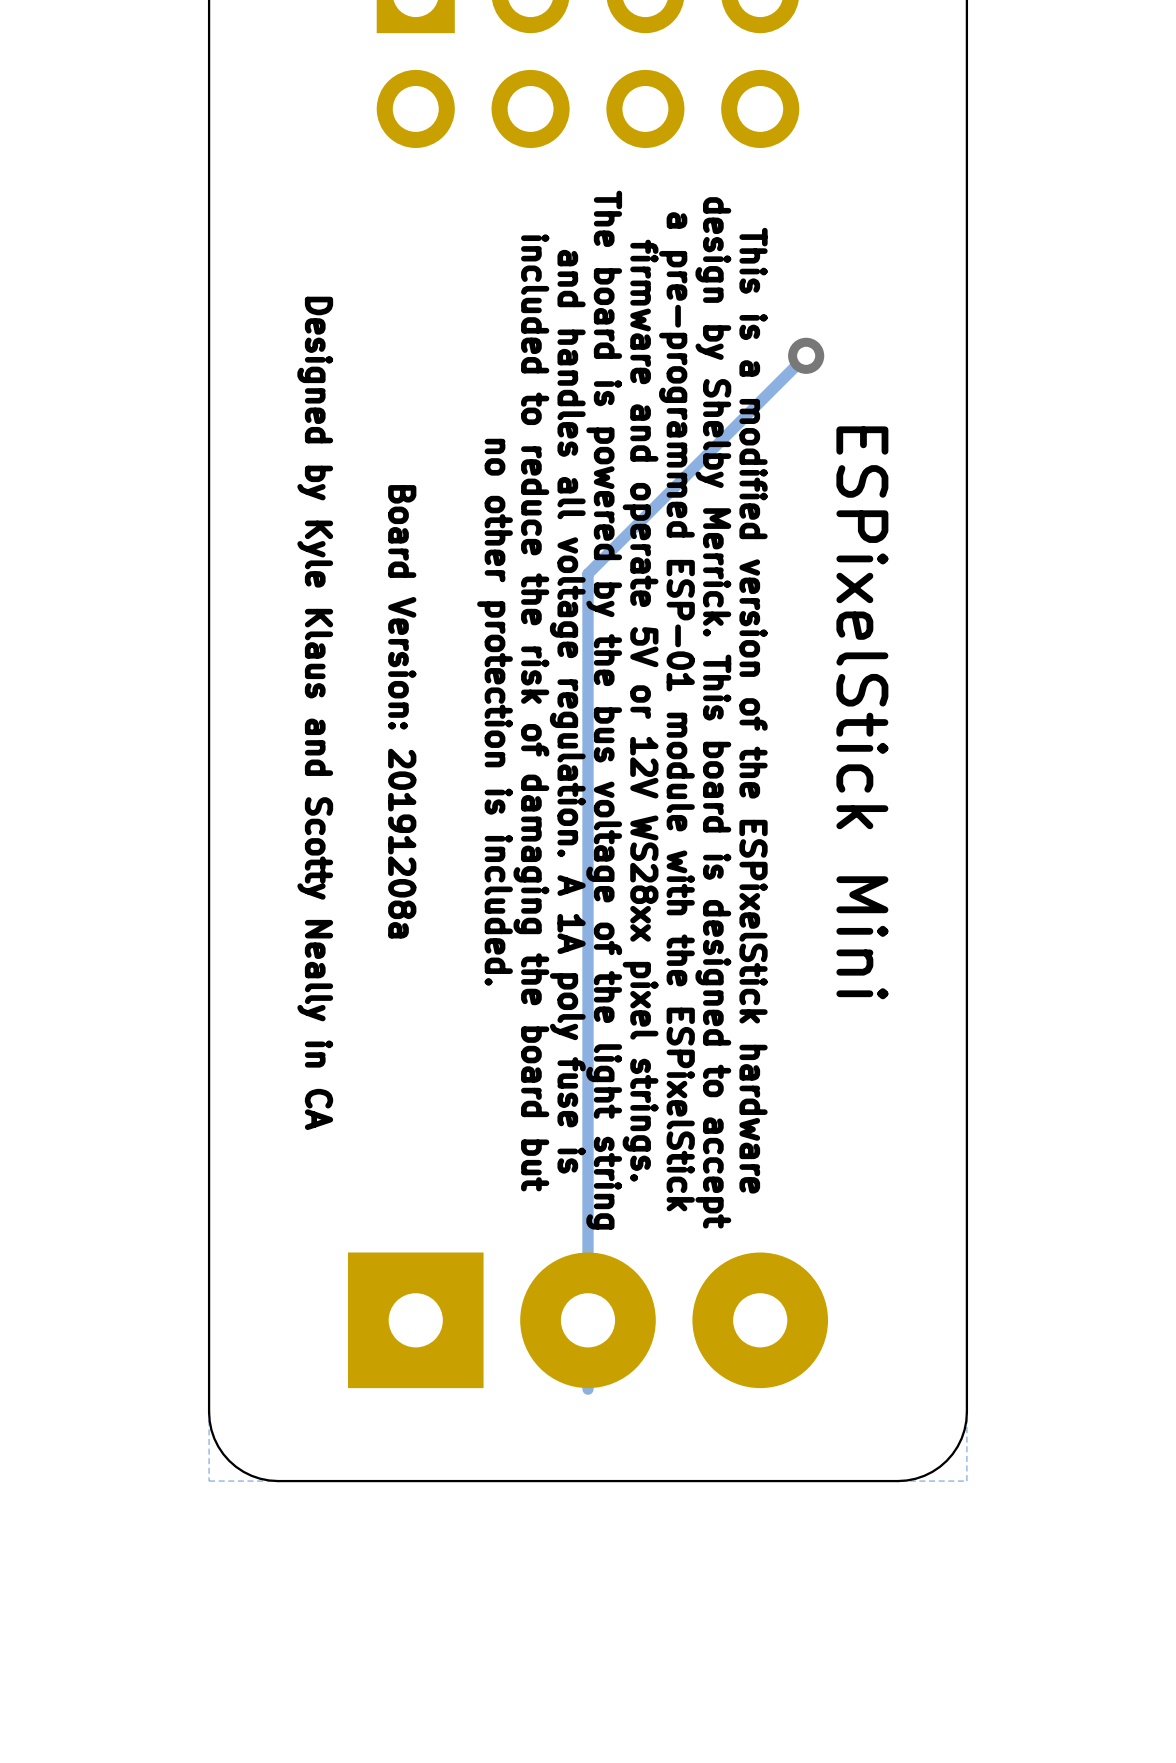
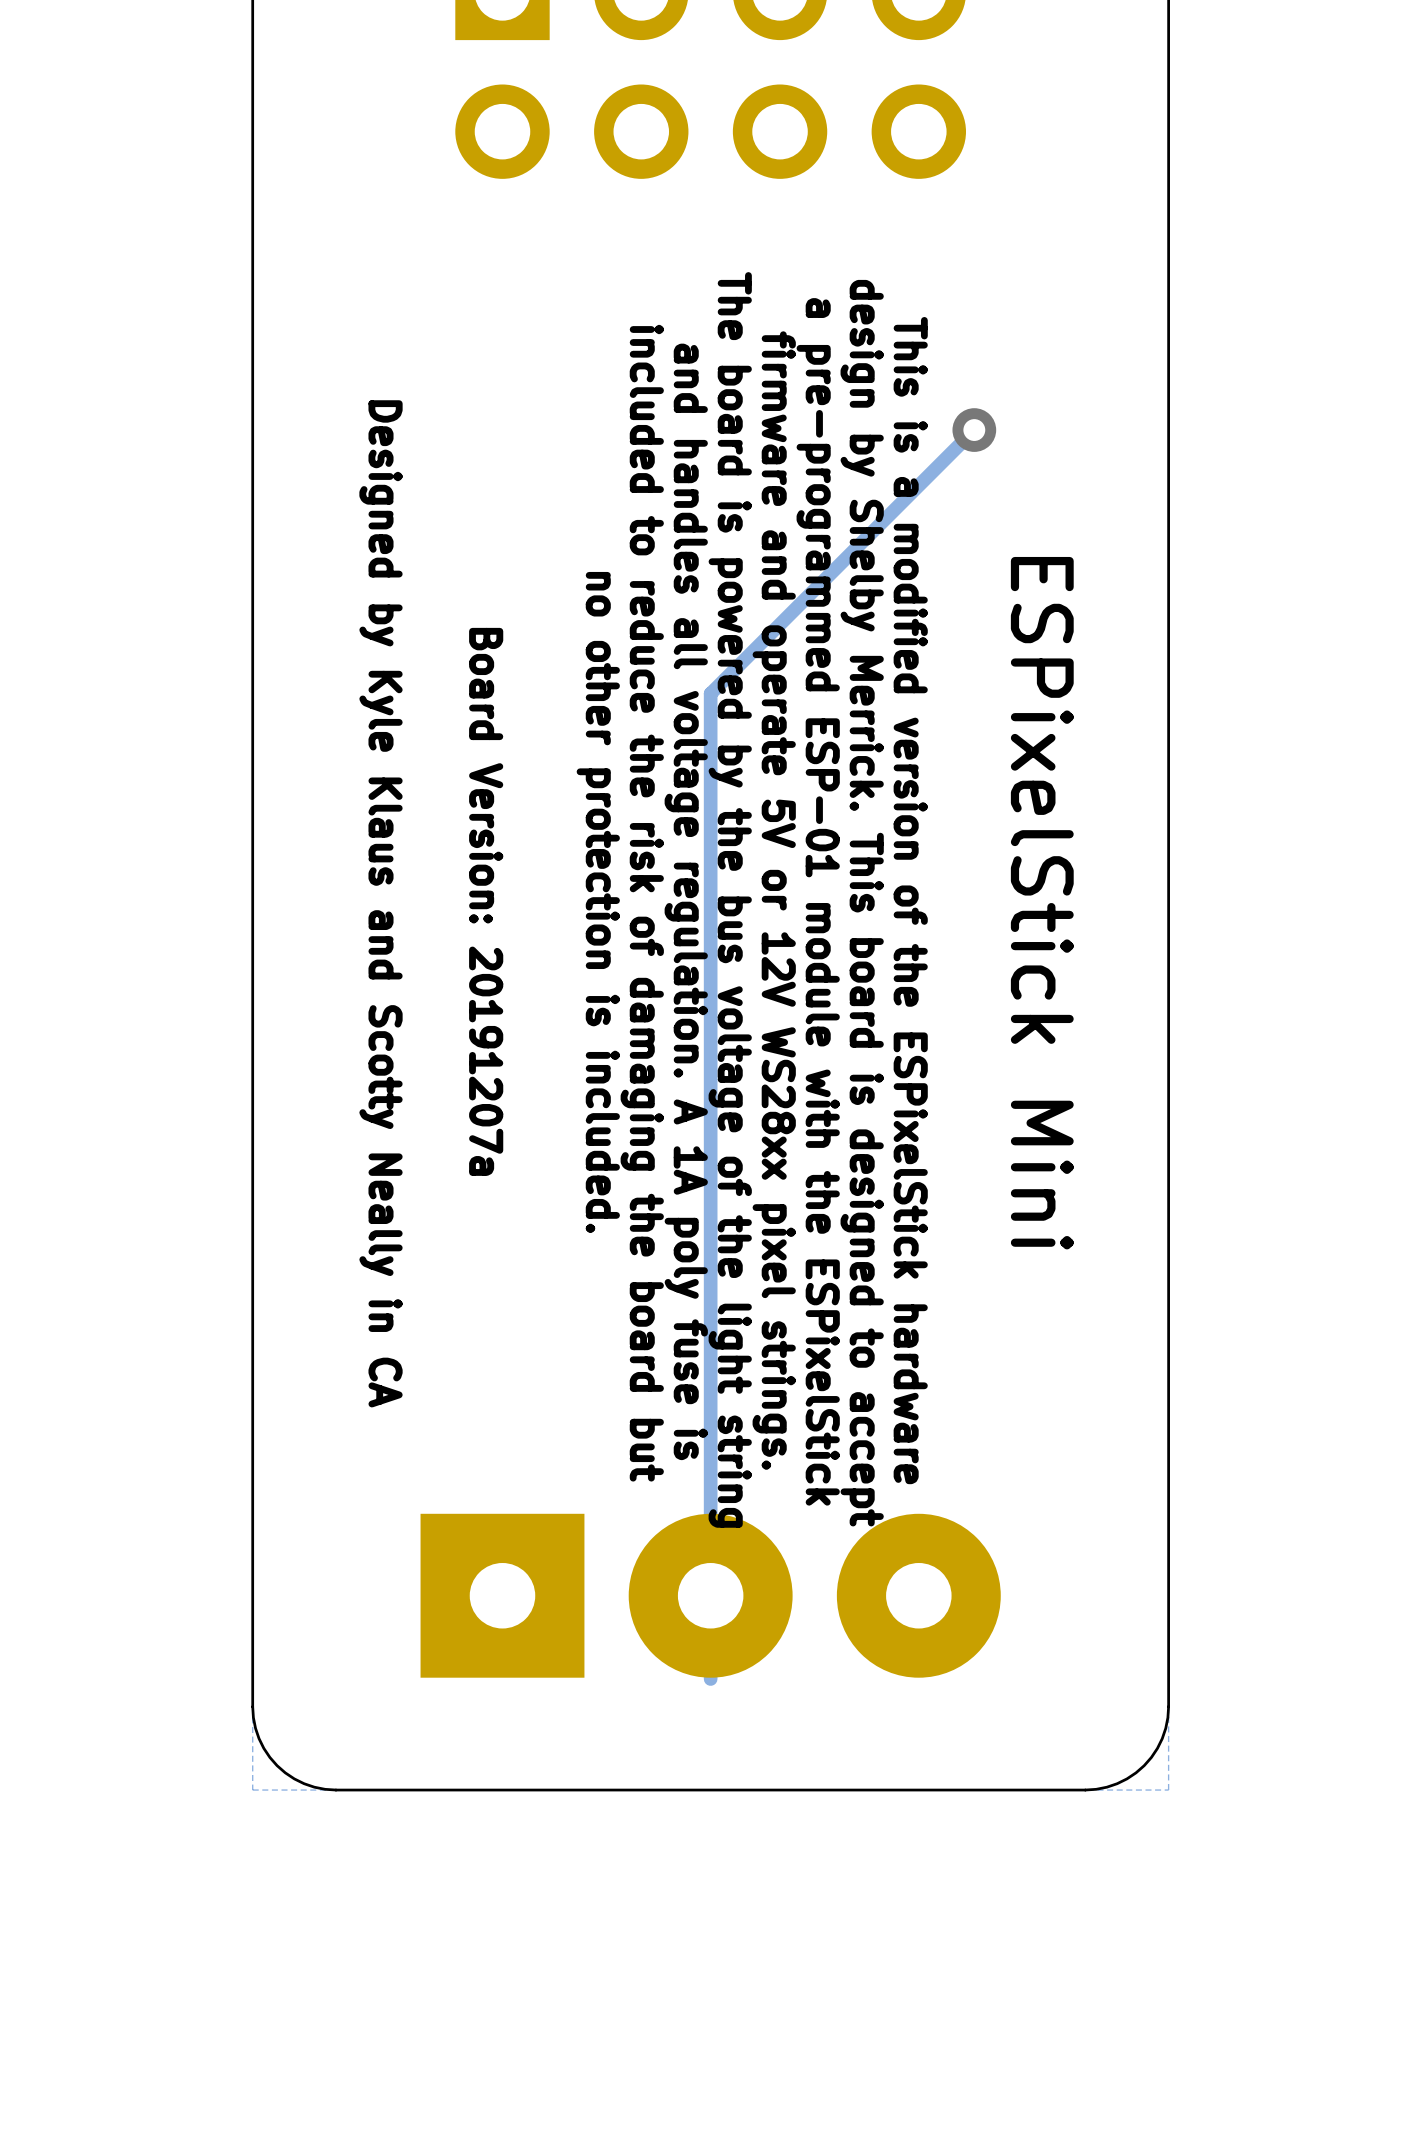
text position: The board is powered by the bus voltage of the light string (604, 710) -> The board is powered by the bus voltage of the light string (730, 899)
text position: firmware and operate 5V or 12V WS28xx pixel strings. (640, 710) -> firmware and operate 5V or 12V WS28xx pixel strings. (774, 900)
text position: This is a modified version of the ESPixelStick hardware (753, 710) -> This is a modified version of the ESPixelStick hardware (910, 900)
text: Board Version: 20191208a (402, 711) -> Board Version: 20191207a (486, 901)
text position: and handles all voltage regulation. A 1A poly fuse is (567, 711) -> and handles all voltage regulation. A 1A poly fuse is (686, 901)
text position: a pre-programmed ESP-01 module with the ESPixelStick (676, 711) -> a pre-programmed ESP-01 module with the ESPixelStick (818, 901)
text position: no other protection is included. (495, 712) -> no other protection is included. (598, 902)
text position: included to reduce the risk of damaging the board but (531, 712) -> included to reduce the risk of damaging the board but (642, 903)
text position: design by Shelby Merrick. This board is designed to accept (713, 712) -> design by Shelby Merrick. This board is designed to accept (862, 903)
text position: ESPixelStick Mini (862, 712) -> ESPixelStick Mini (1042, 903)
text position: Designed by Kyle Klaus and Scotty Neally in CA (315, 713) -> Designed by Kyle Klaus and Scotty Neally in CA (381, 903)

